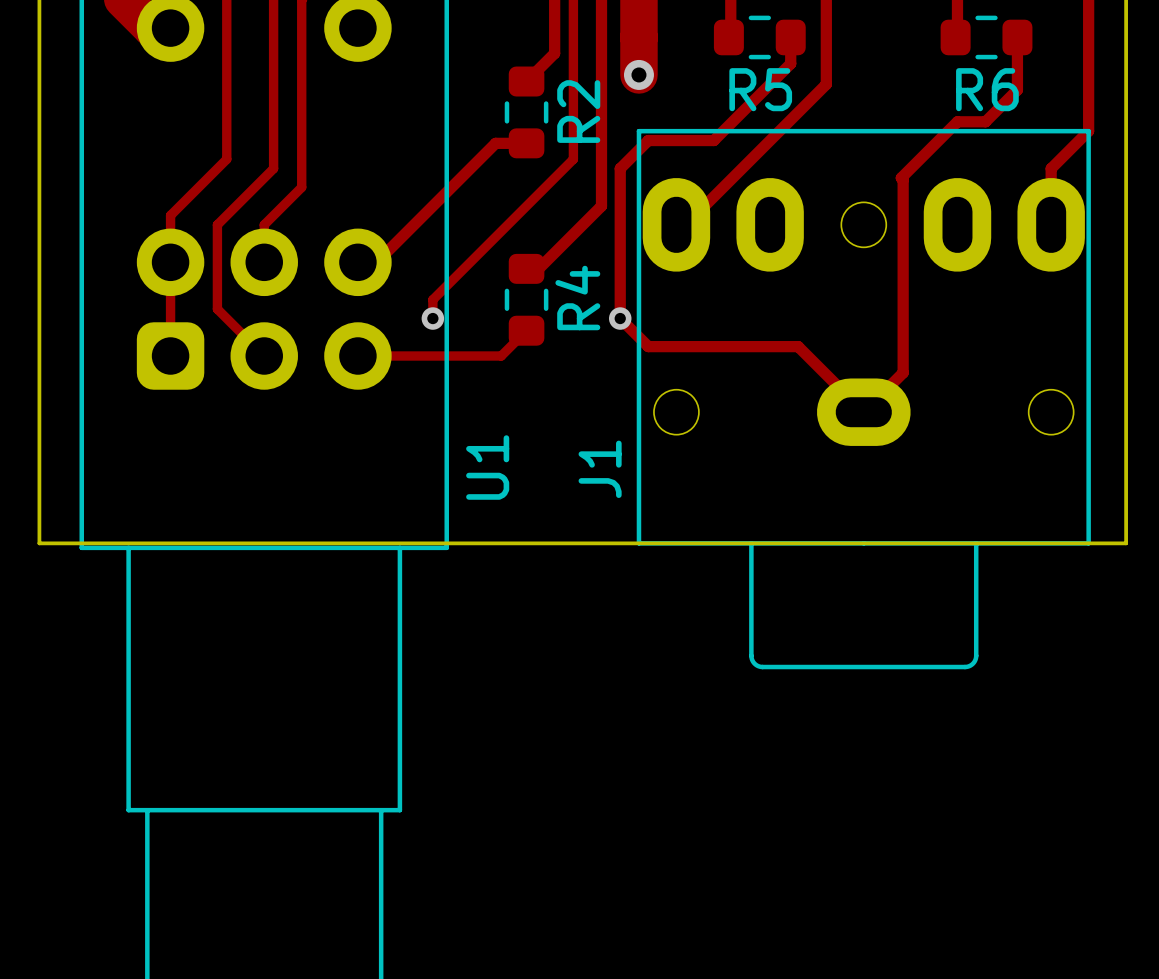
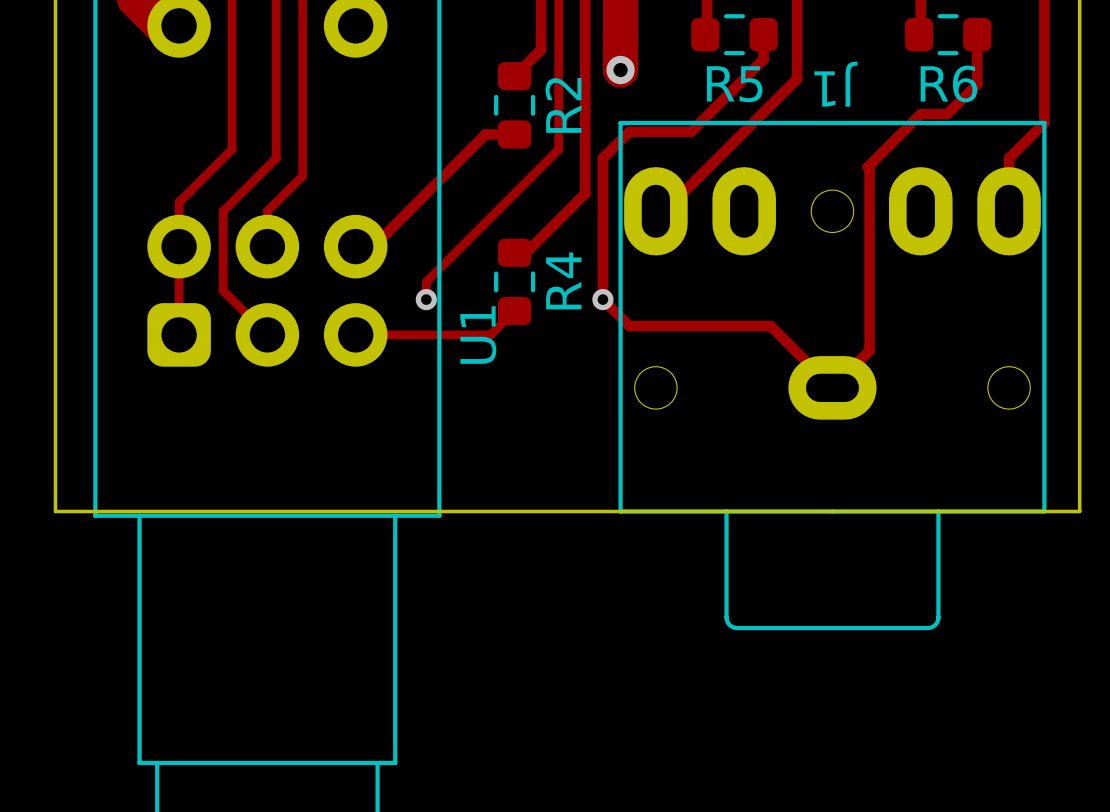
U1 name position: U1 (487, 467) -> U1 (478, 335)
J1 name rotation: 0° (600, 469) -> 90° counterclockwise (835, 84)
J1 name position: J1 (600, 469) -> J1 (835, 84)

